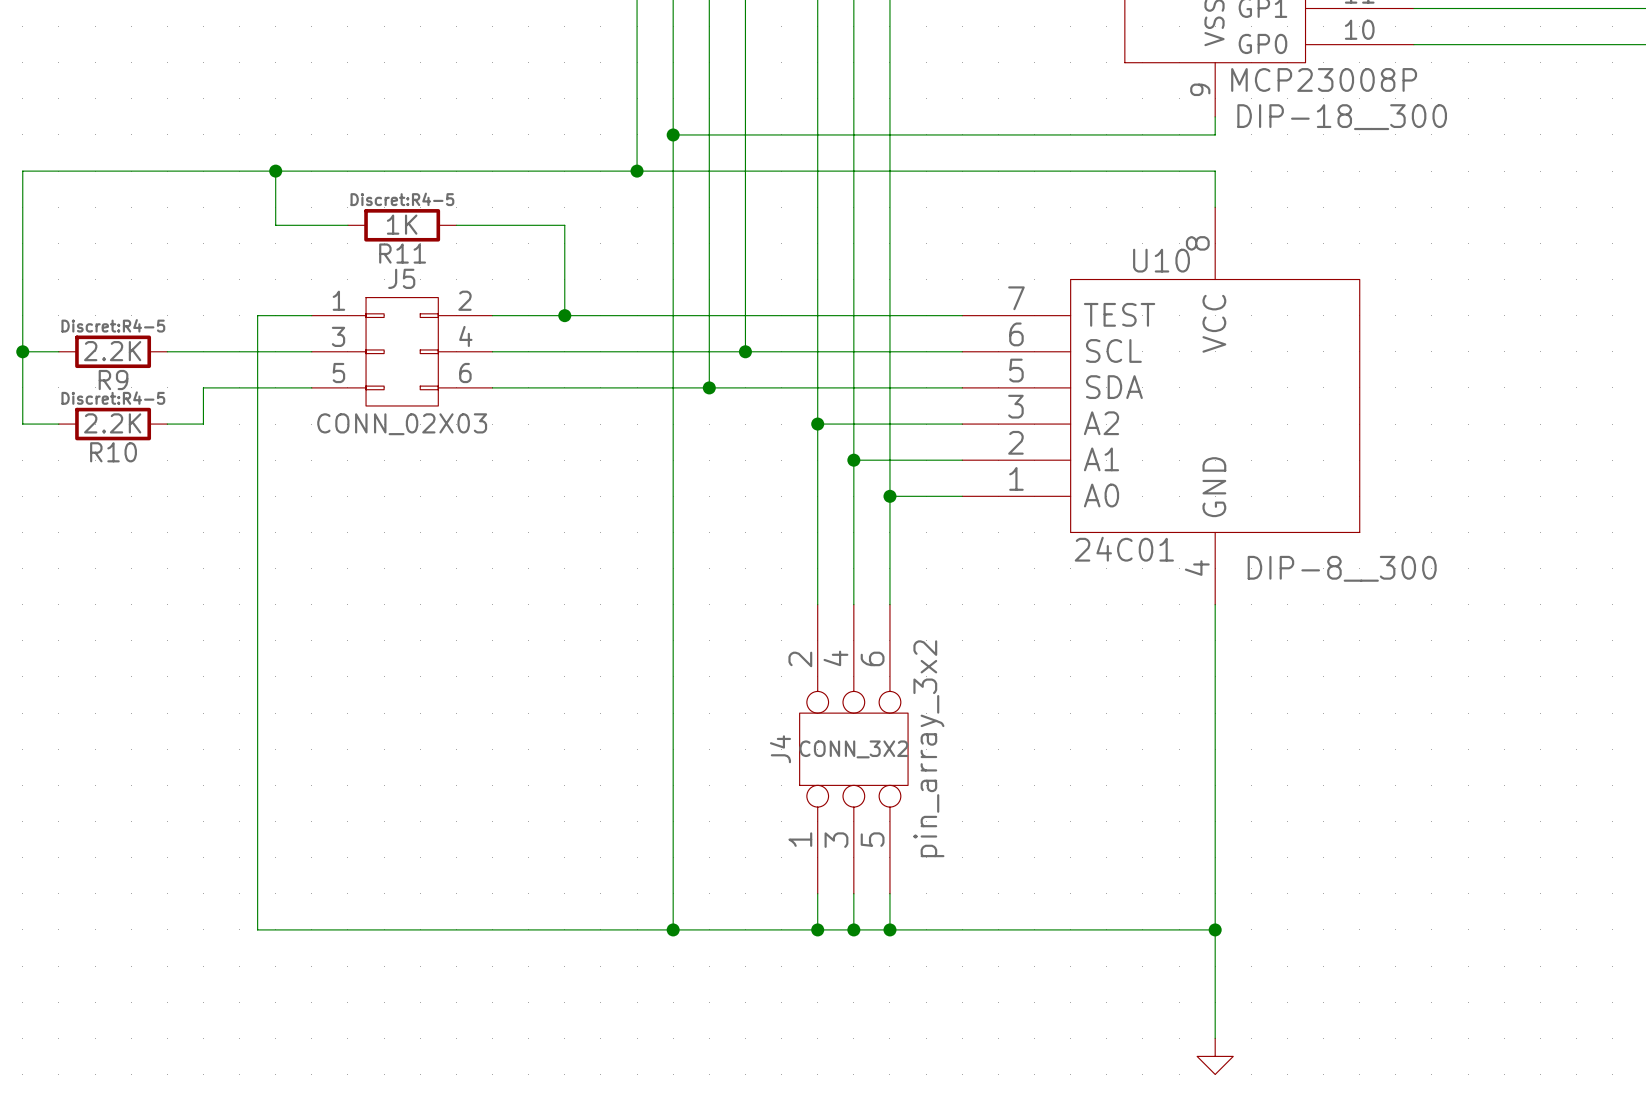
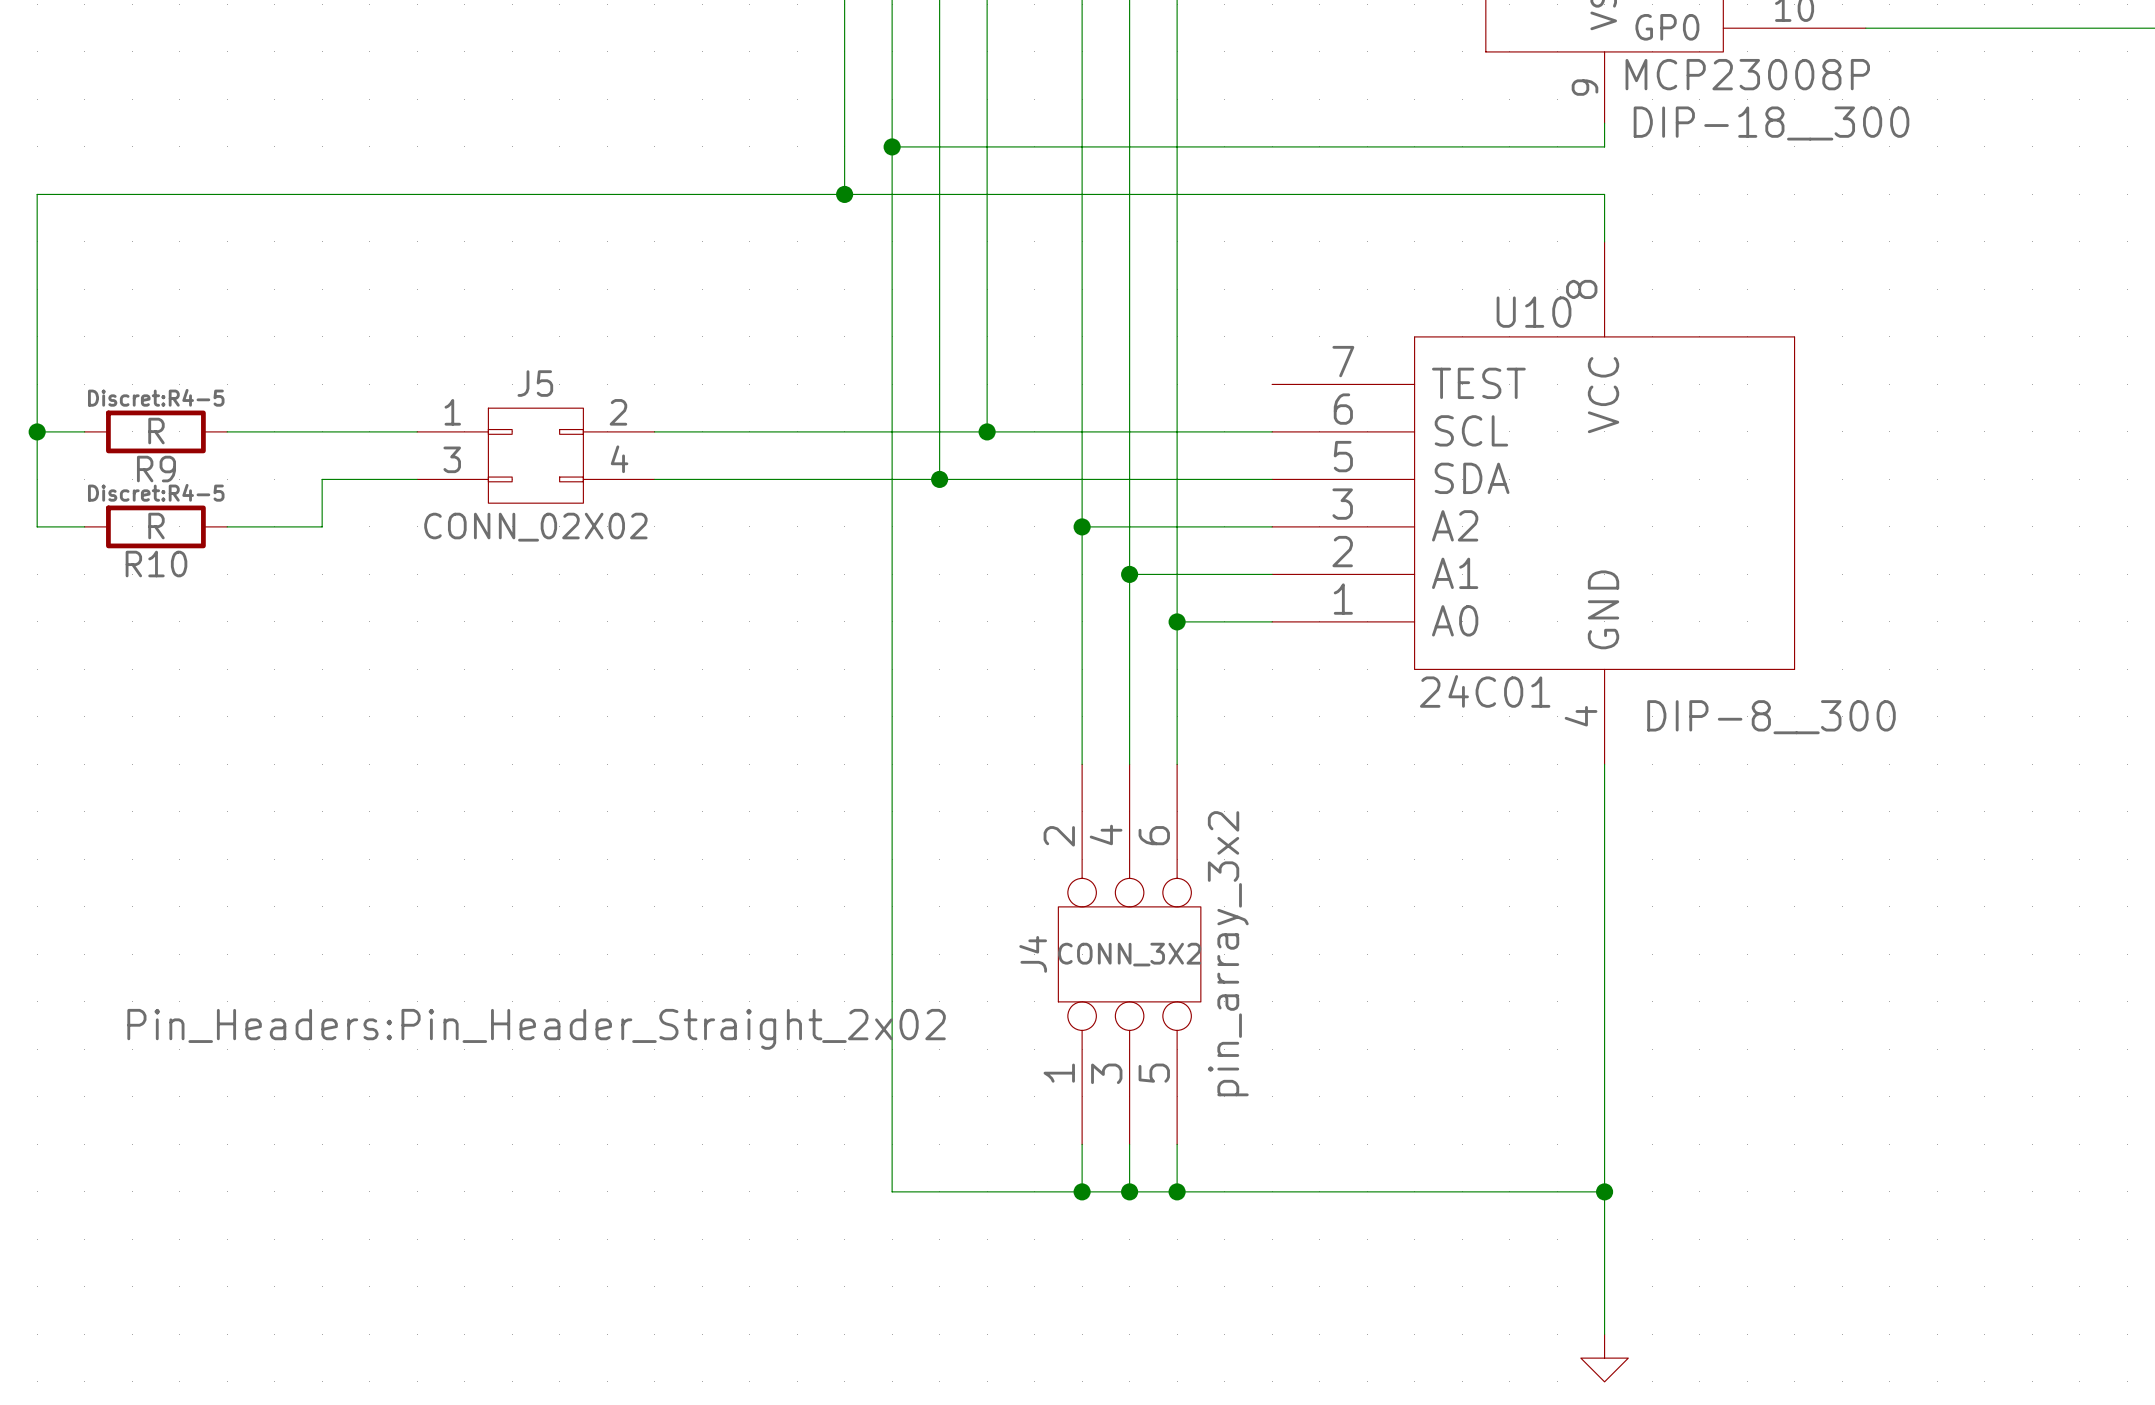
wire: (275, 171) (275, 225) (347, 225) -> none
junction: (275, 171) -> none
R11: 1K (402, 225) -> none
wire: (456, 225) (564, 225) (564, 315) -> none
J5 symbol: [311, 297, 493, 406] -> [417, 408, 655, 504]
wire: (311, 315) (257, 315) (257, 929) (673, 929) -> none
wire: (492, 315) (962, 315) -> none
junction: (564, 315) -> none
R9 value: 2.2K (112, 351) -> R (156, 431)
wire: (239, 387) (203, 387) (203, 424) -> (322, 479) (322, 526) (274, 526)
R10 value: 2.2K (112, 423) -> R (156, 526)
J5 value: CONN_02X03 (402, 424) -> CONN_02X02 (535, 527)
J5 text: none -> Pin_Headers:Pin_Header_Straight_2x02 (536, 1029)
junction: (673, 929) -> none

